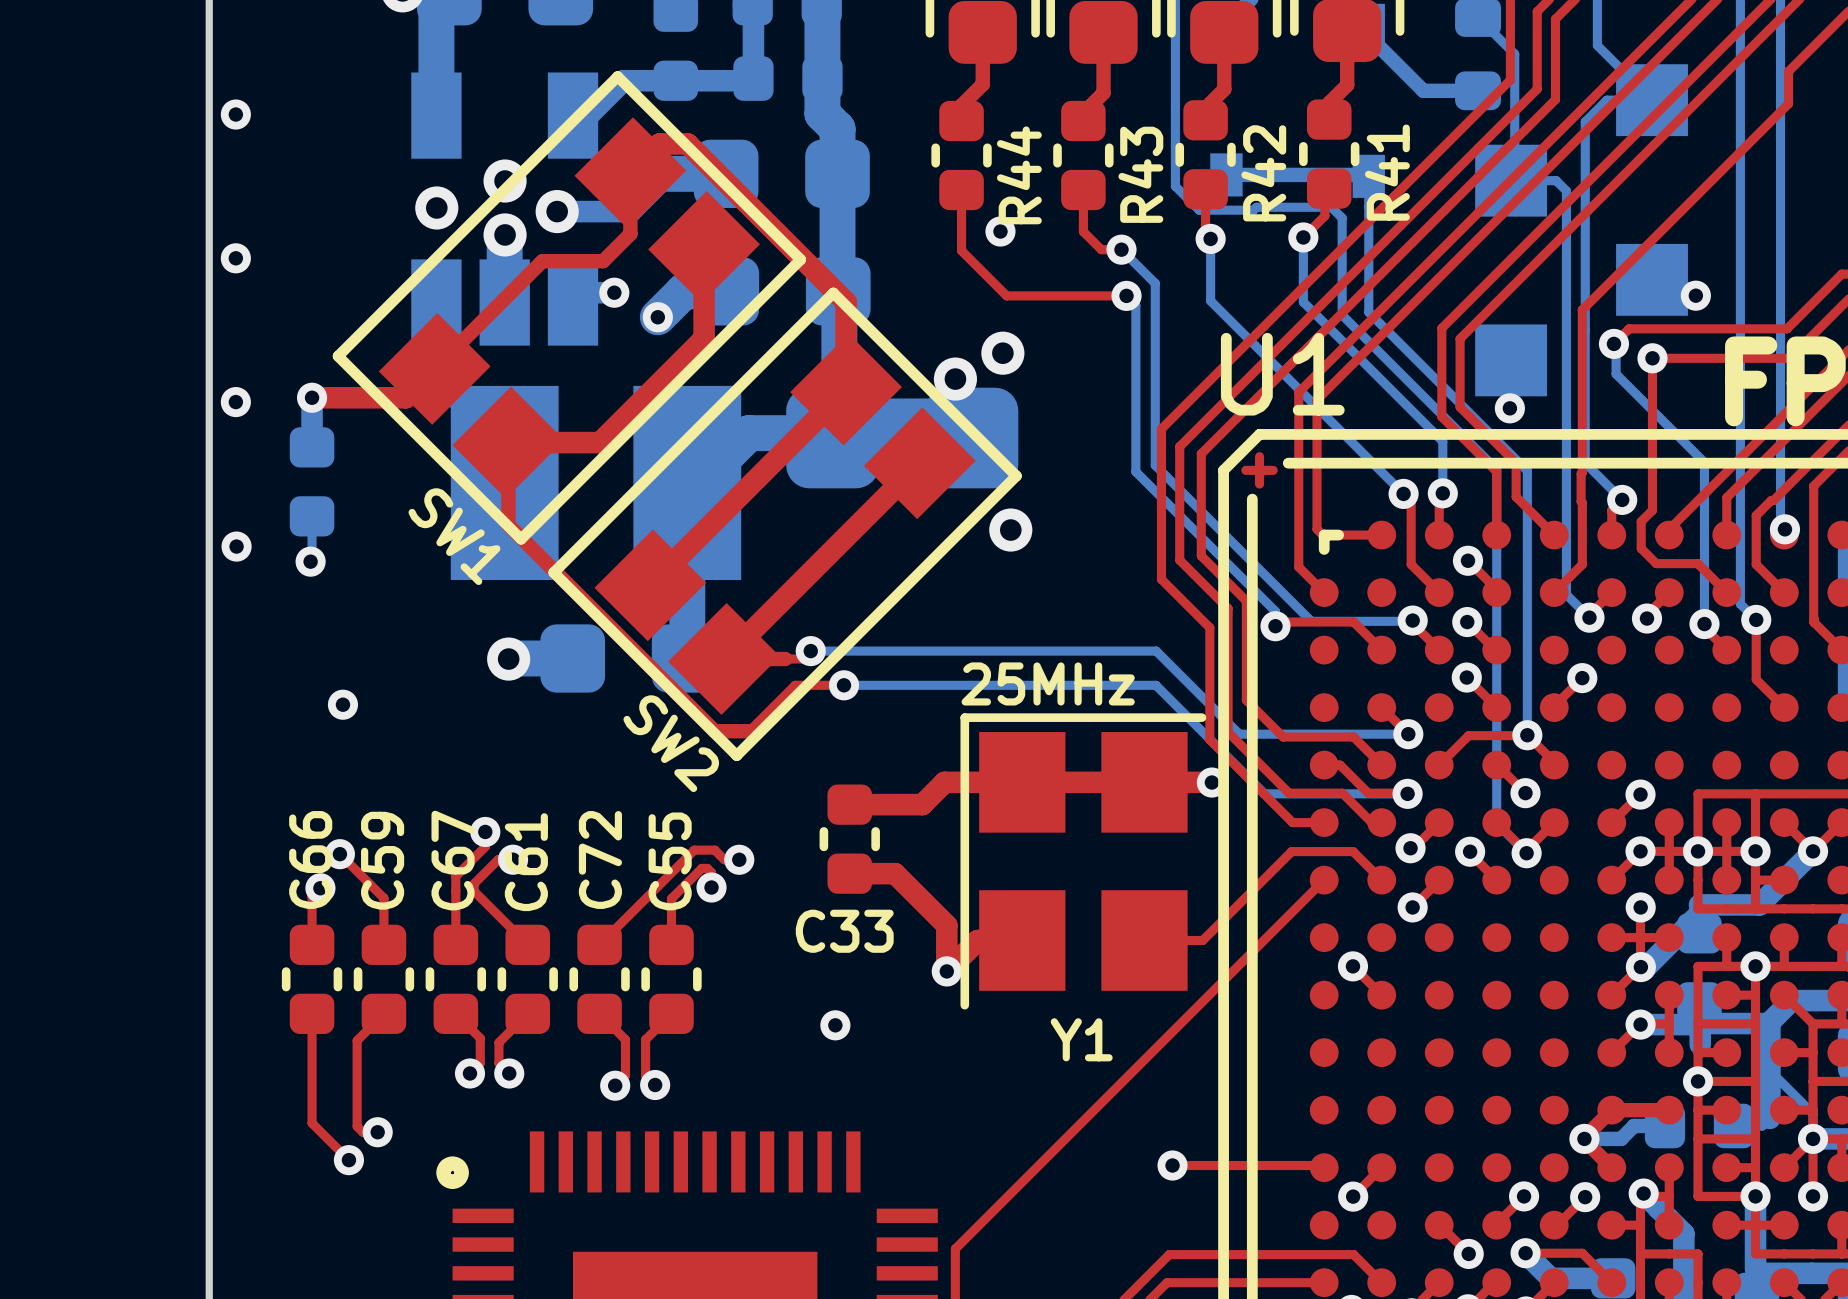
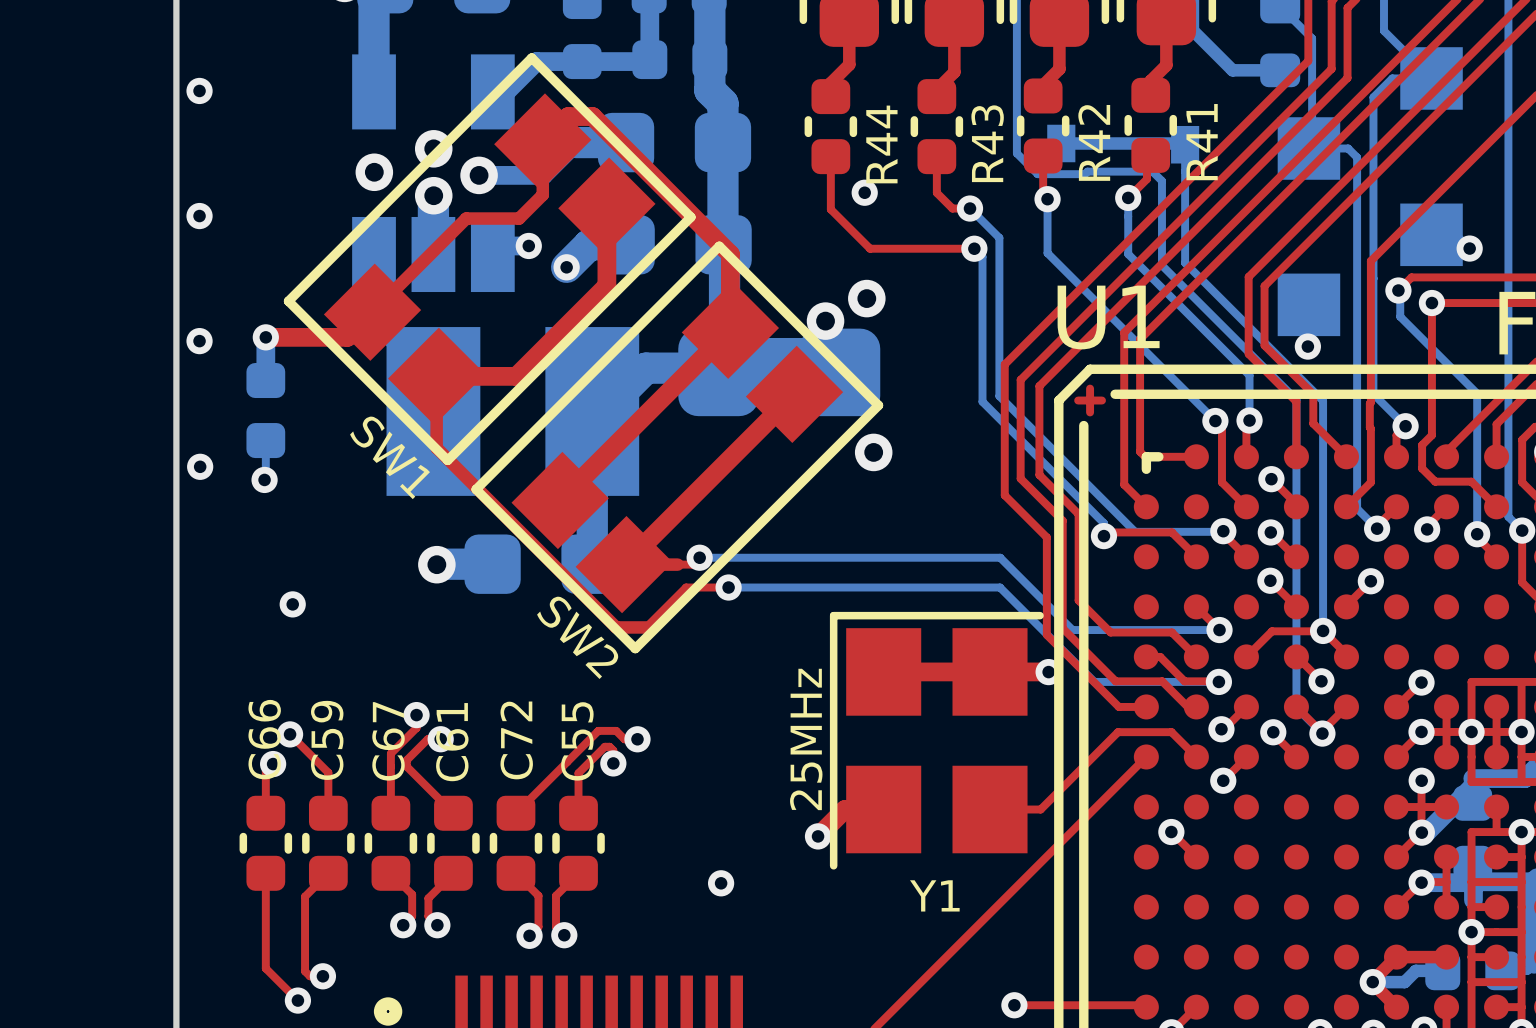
text rotation: 0° (1048, 683) -> 90° counterclockwise (806, 739)
text position: 25MHz (1048, 683) -> 25MHz (806, 739)
top track: (1022, 782) (944, 782) (922, 804) (849, 804) -> none
C33: (849, 839) -> none
top track: (849, 873) (895, 873) (946, 925) (946, 971) -> none

